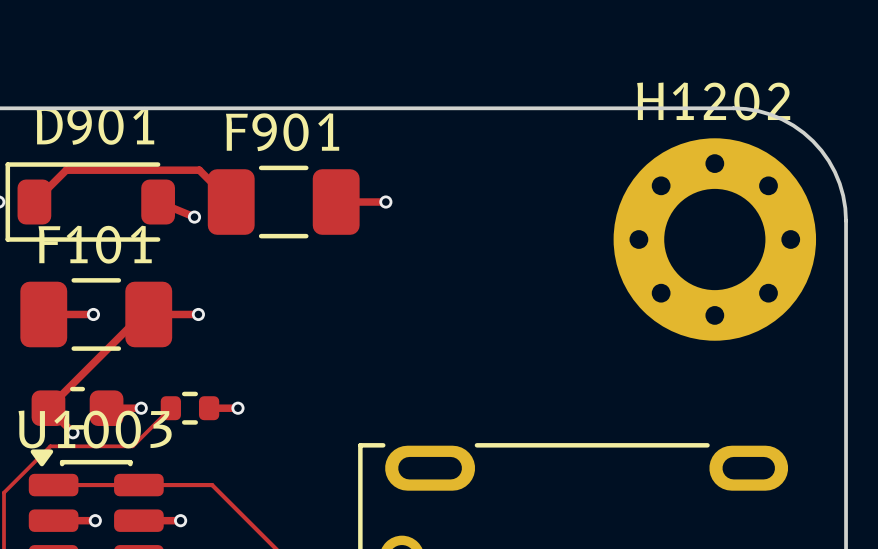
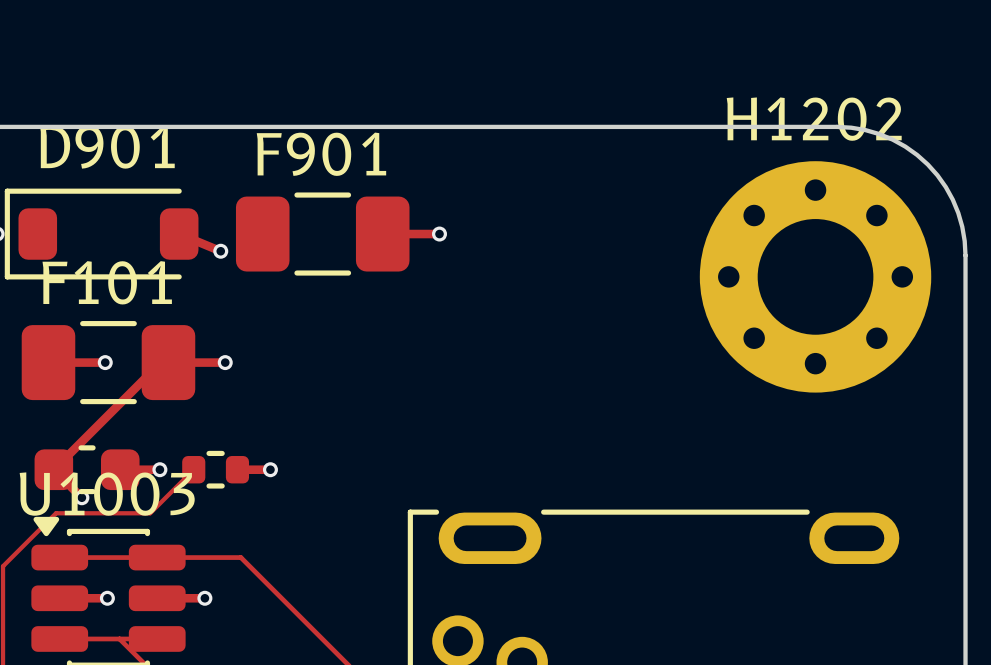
top track: (34, 202) (66, 170) (199, 170) (231, 202) -> none

